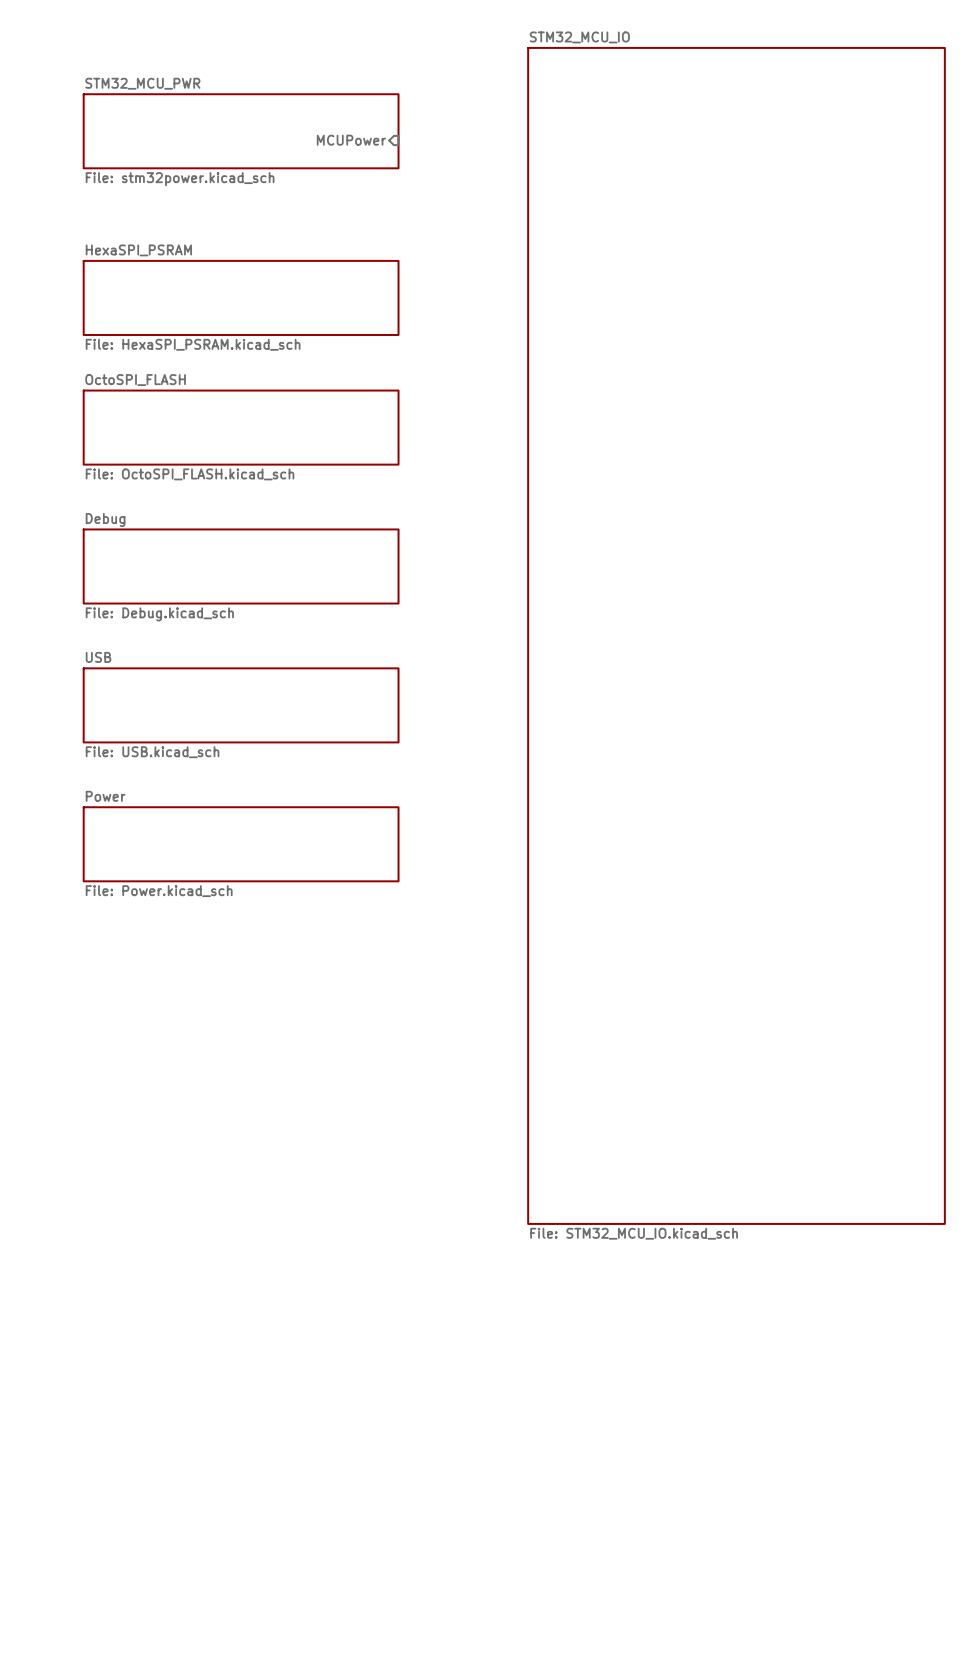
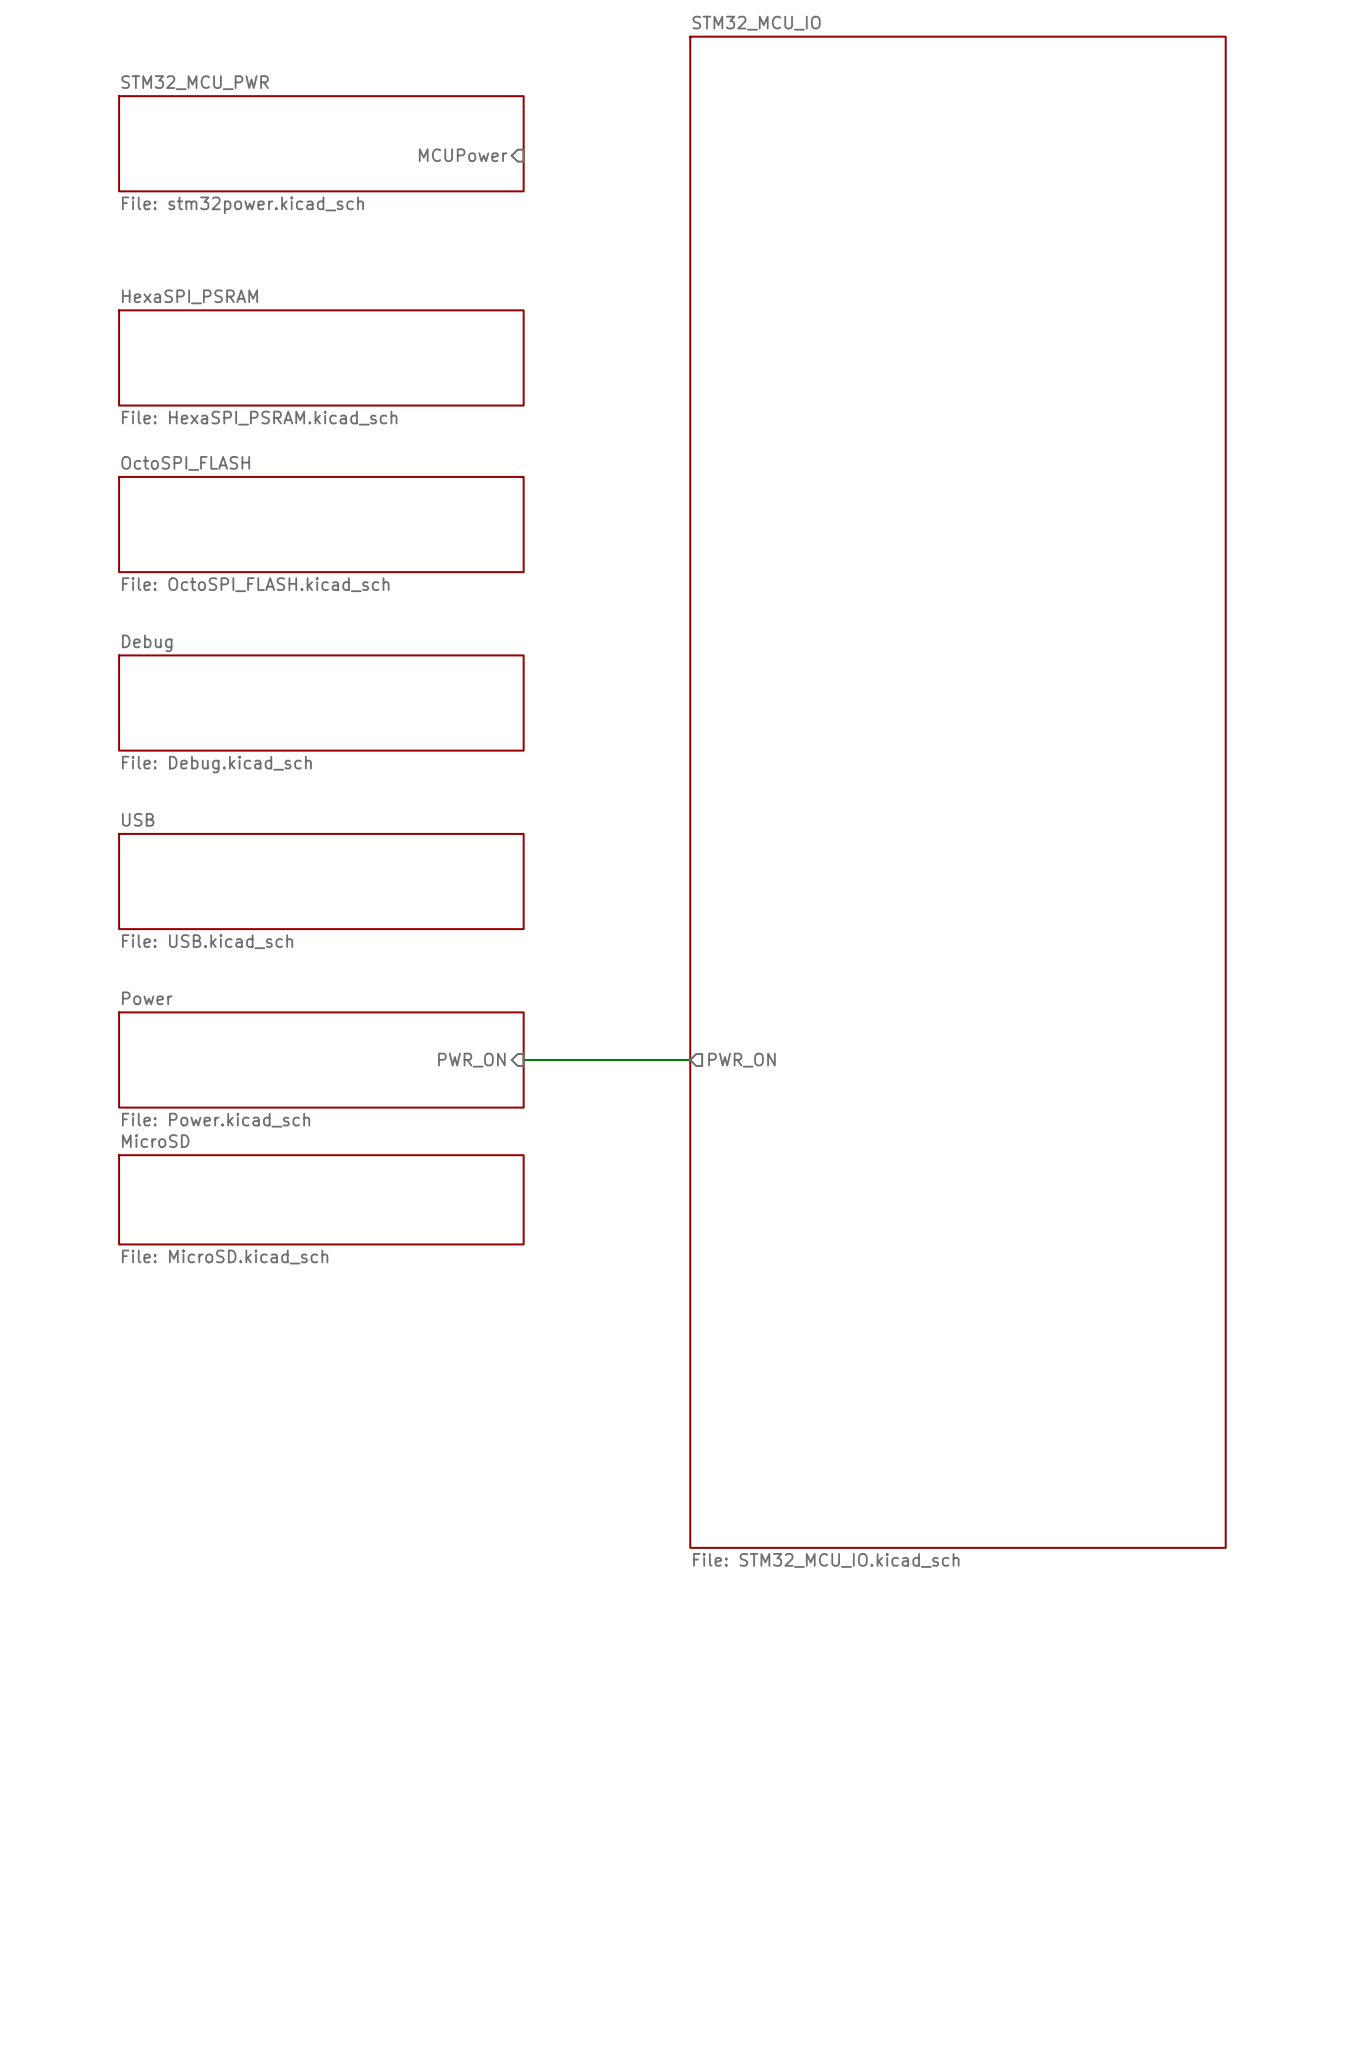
sheet pin: none -> PWR_ON (471, 1060)
wire: none -> (523, 1060) (690, 1060)
sheet pin: none -> PWR_ON (741, 1060)
sheet MicroSD: none -> File: MicroSD.kicad_sch (321, 1199)

